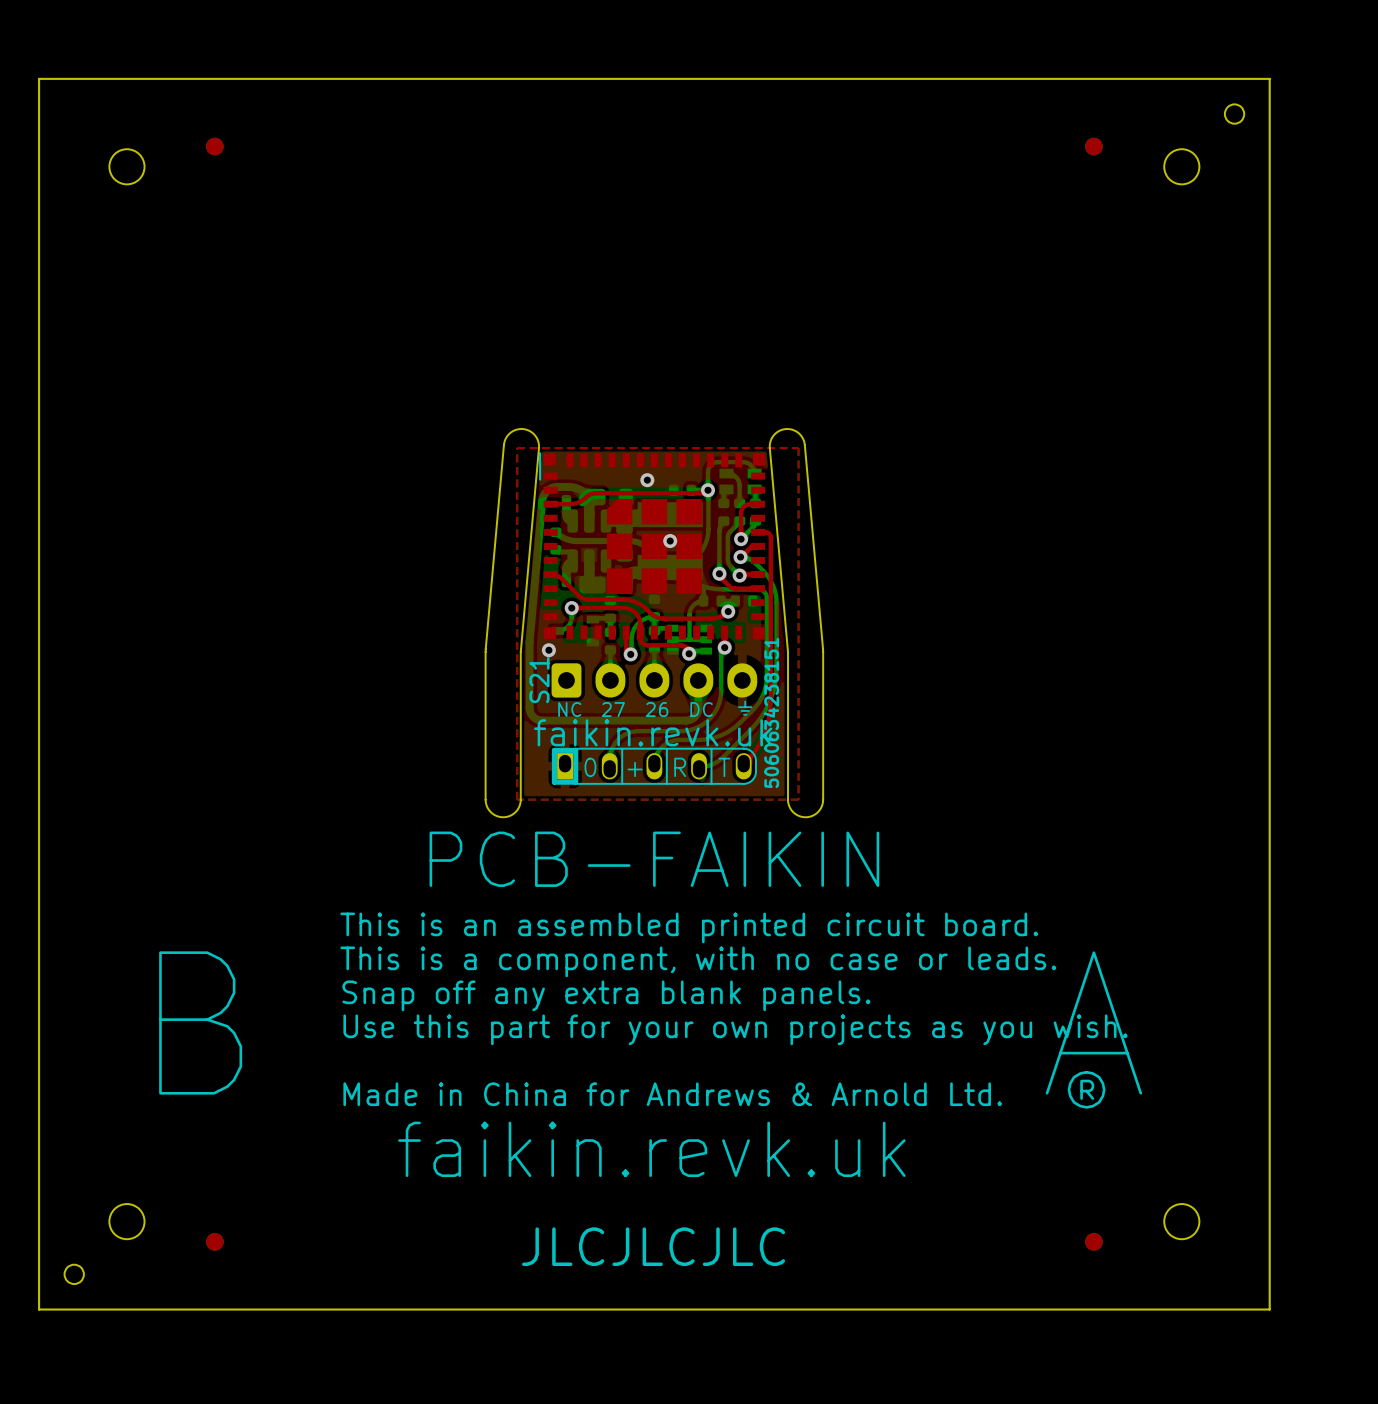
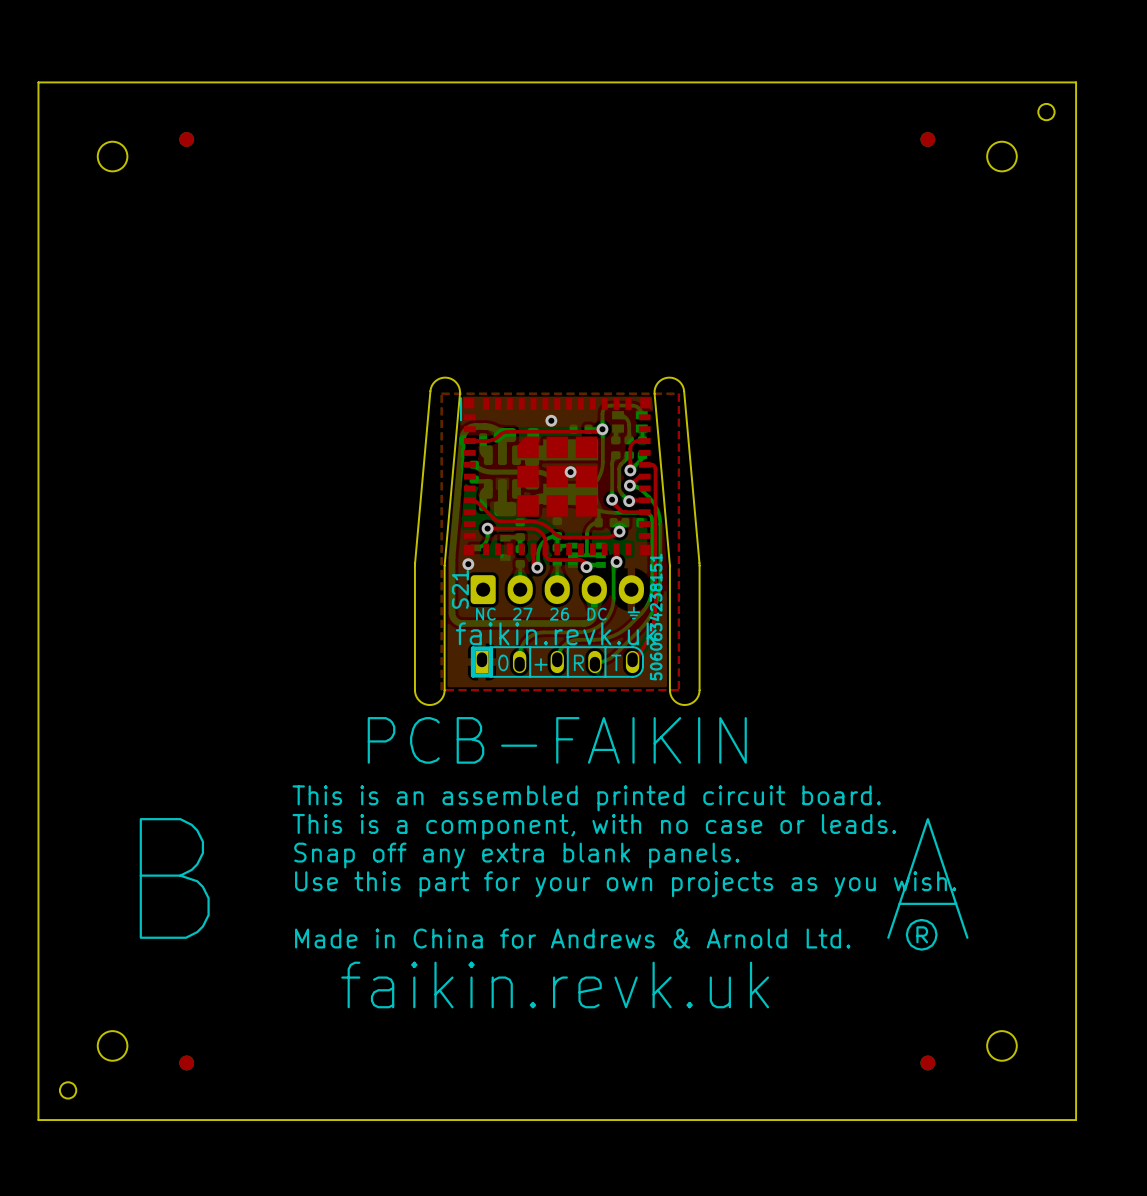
text: JLCJLCJLC (653, 1246) -> none

